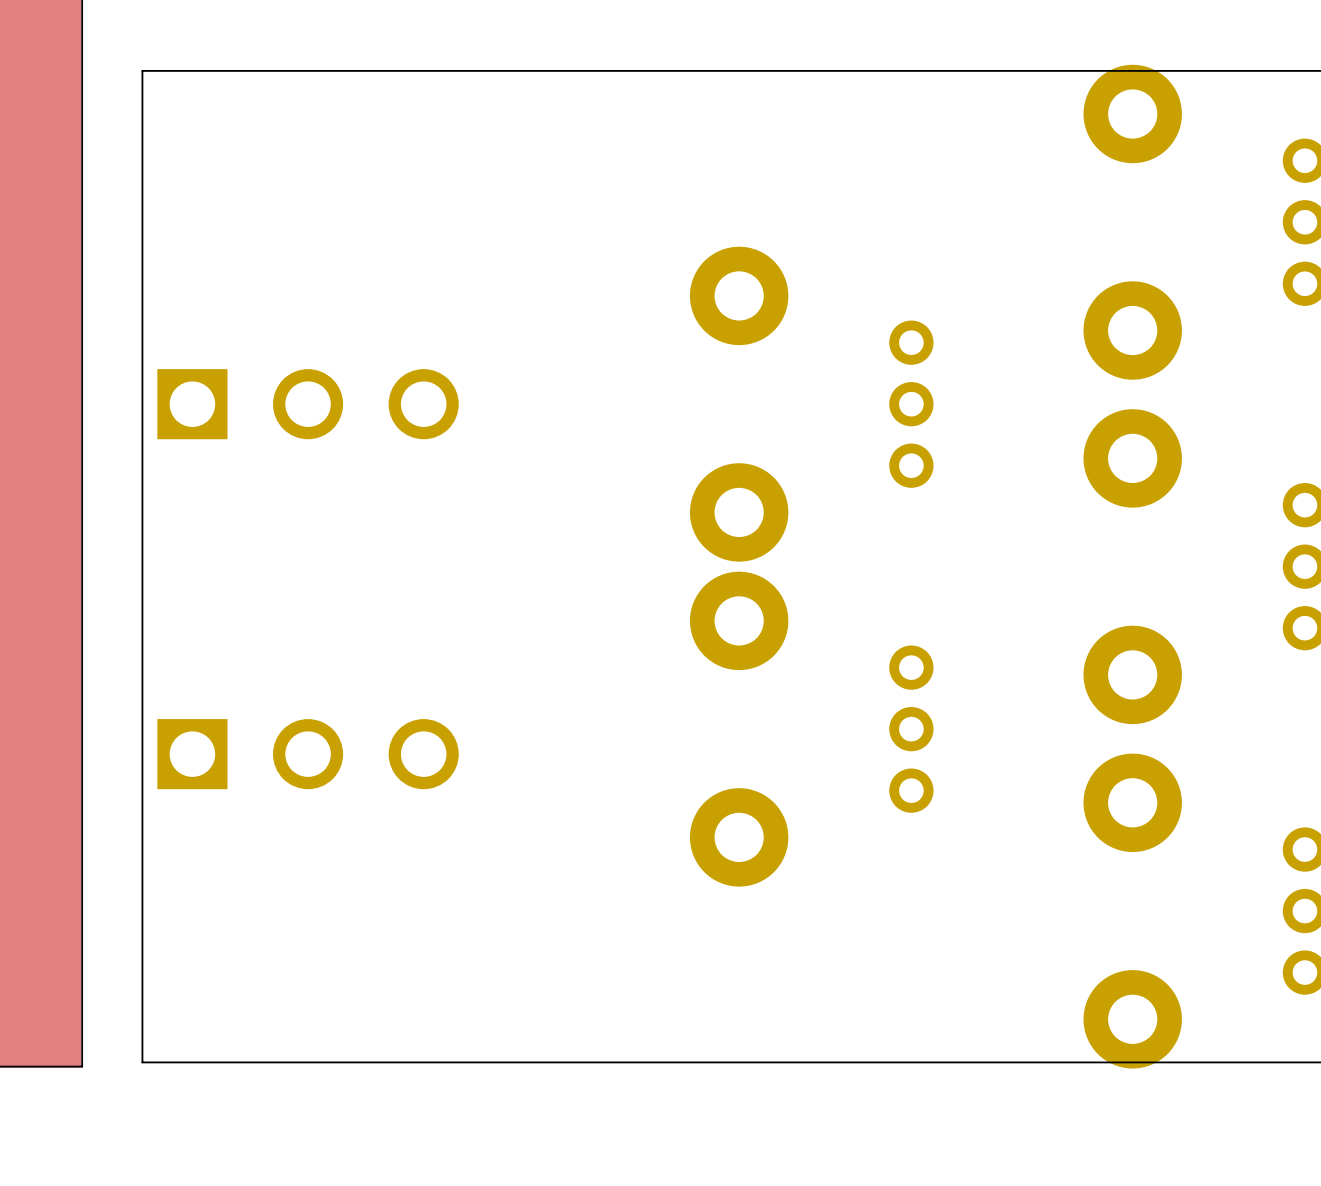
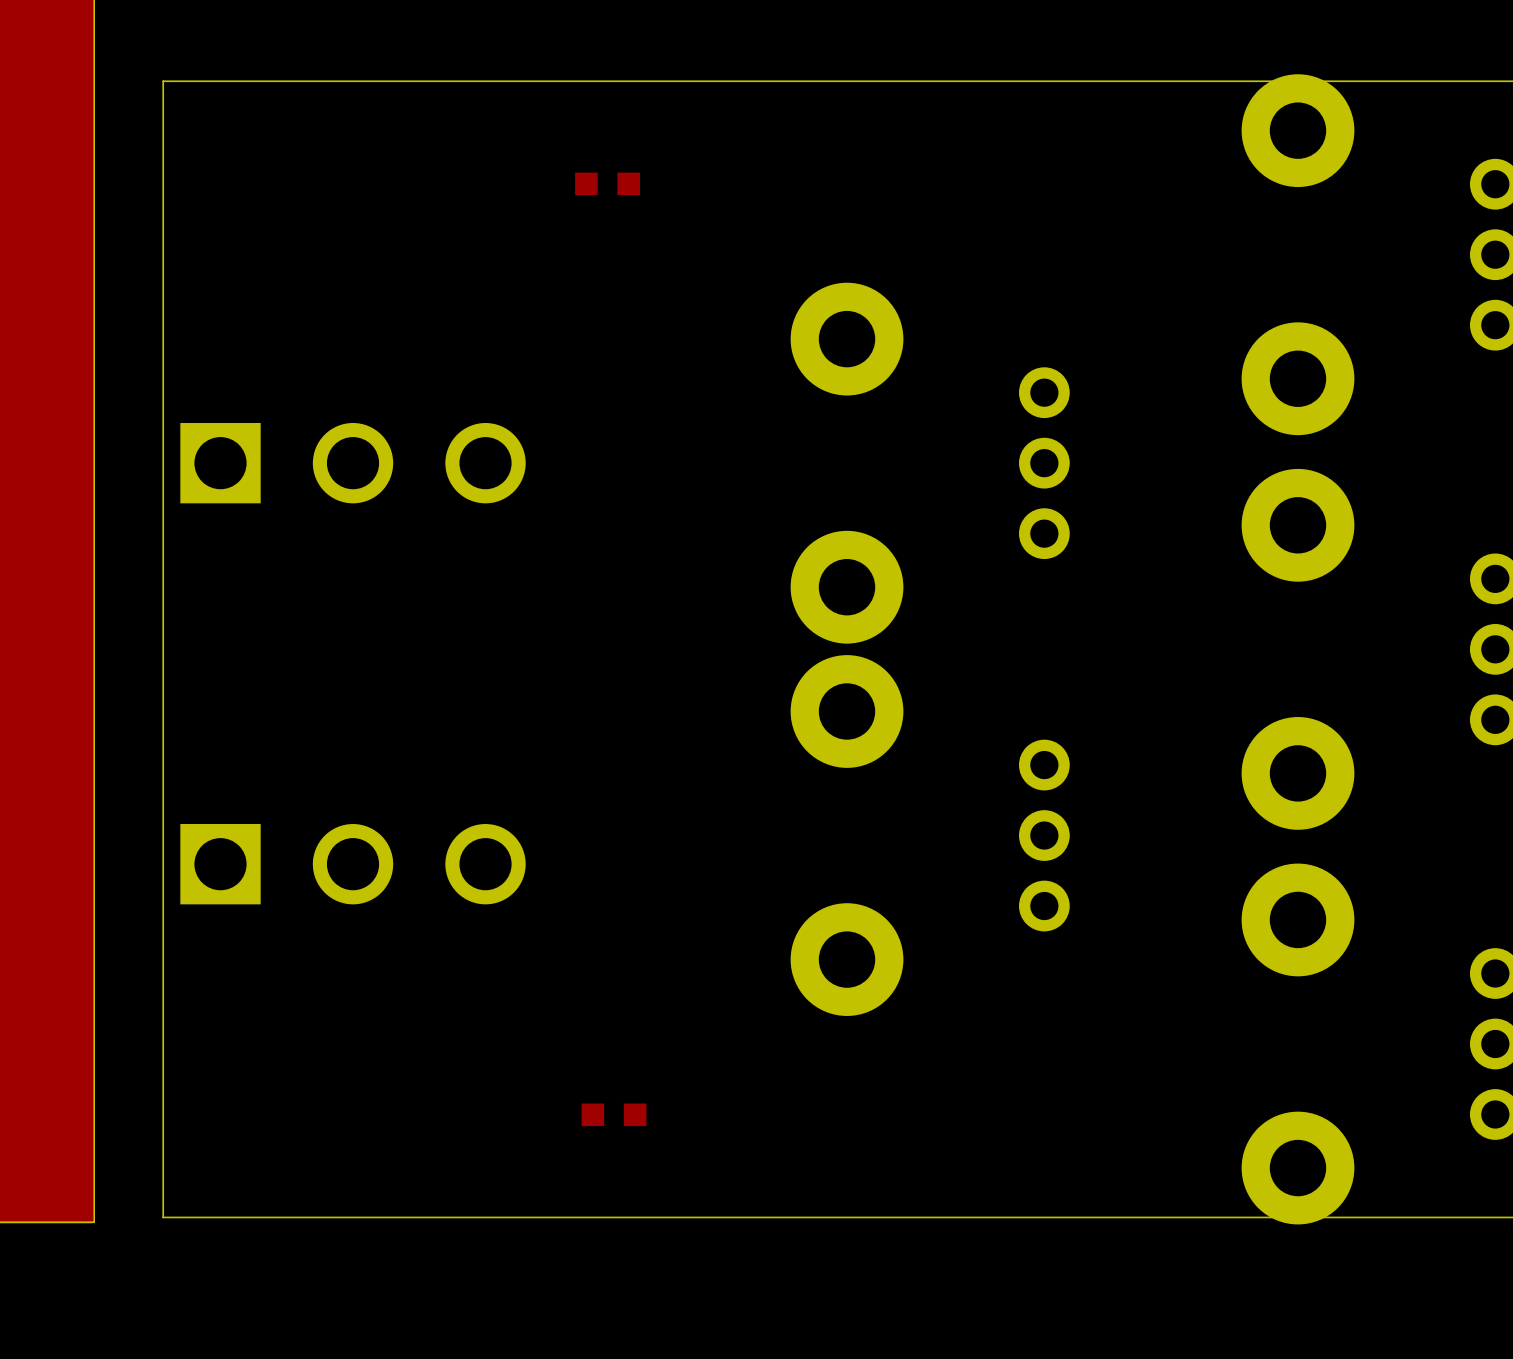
part: none -> (607, 183)
part: none -> (614, 1114)

